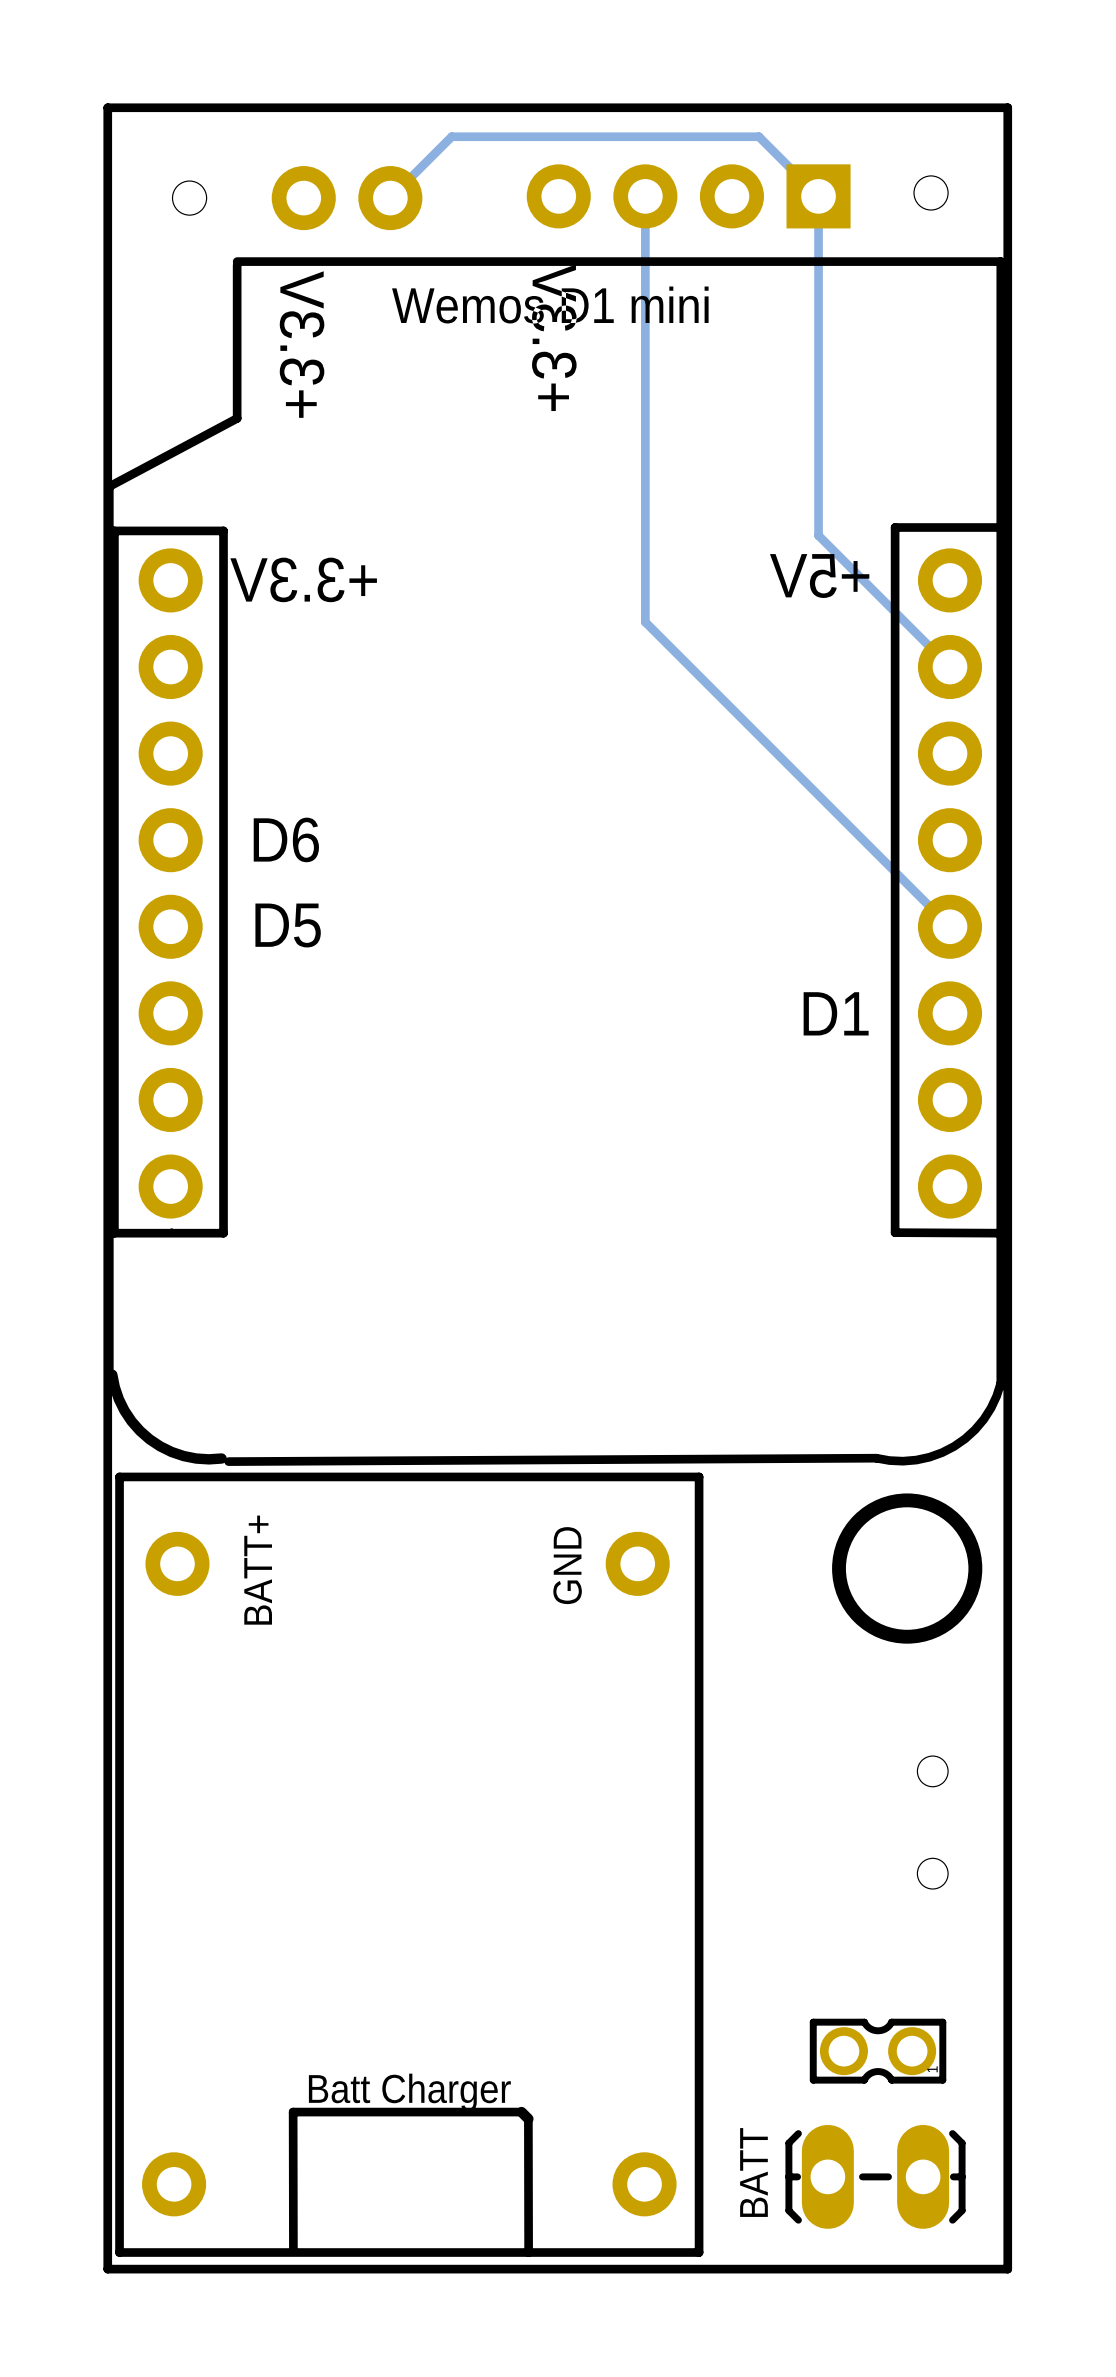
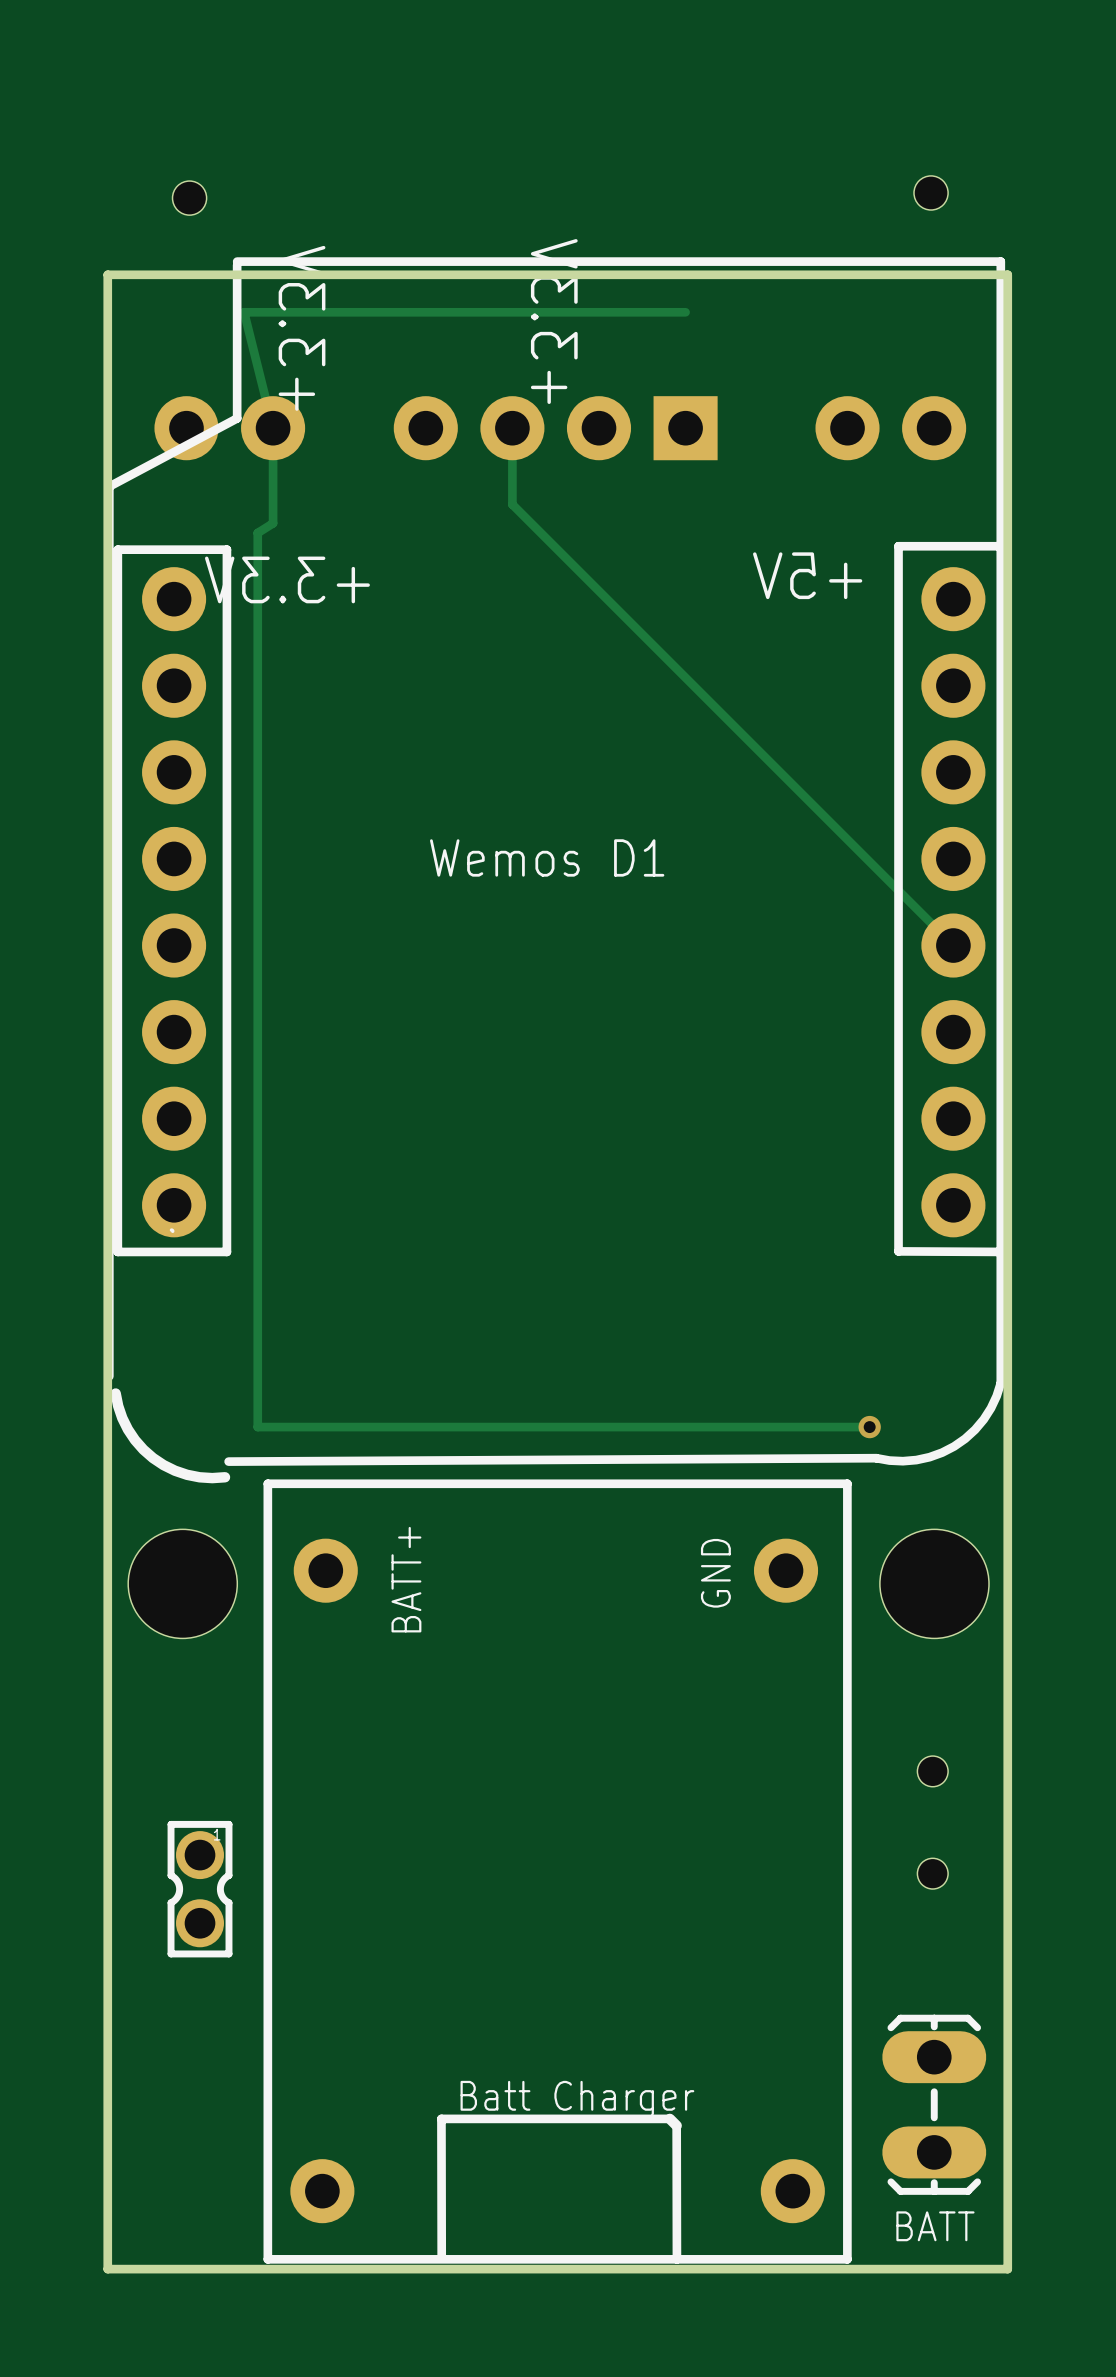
track: (645, 196) (645, 622) (949, 926) -> none
part position: (688, 196) -> (555, 428)
part position: (347, 198) -> (229, 428)
track: (390, 198) (451, 136) (758, 136) (818, 196) (818, 535) (949, 667) -> none
board edge: (1007, 274) (1007, 107) (107, 107) (107, 274) -> (1007, 274) (107, 274)
part value: Wemos D1 mini (550, 305) -> Wemos D1 (547, 857)
track: none -> (685, 312) (244, 312) (273, 428) (273, 523) (257, 533) (257, 1427) (869, 1427)
track: none -> (512, 428) (512, 504) (953, 945)
part: none -> (890, 428)
line: (997, 527) (895, 527) (895, 1232) (1000, 1233) -> (1000, 546) (898, 546) (898, 1251) (1004, 1251)
line: (223, 530) (223, 1233) (114, 1233) (114, 530) (223, 530) -> (226, 549) (226, 1251) (117, 1251) (117, 549) (226, 549)
text: D6 (286, 839) -> none
part position: (170, 883) -> (174, 902)
part position: (949, 883) -> (953, 902)
text: D5 (288, 925) -> none
text: D1 (836, 1013) -> none
line: (112, 1374) (118, 1399) (124, 1410) (131, 1421) (149, 1439) (160, 1446) (183, 1456) (196, 1458) (221, 1458) -> (115, 1393) (122, 1418) (127, 1429) (135, 1440) (153, 1458) (163, 1465) (187, 1474) (199, 1477) (225, 1477)
via: none -> (869, 1427)
line: (699, 1476) (699, 2252) (119, 2252) (119, 1476) (699, 1476) -> (847, 1483) (847, 2259) (267, 2259) (267, 1483) (847, 1483)
round board edge: [832, 1493, 983, 1644] -> none
part footprint: [145, 1531, 210, 1596] -> [128, 1529, 238, 1639]
part position: (637, 1563) -> (786, 1570)
text position: GND (567, 1565) -> GND (715, 1573)
text position: BATT+ (258, 1570) -> BATT+ (406, 1579)
part: none -> (325, 1570)
part: none -> (934, 1583)
part: none -> (200, 1889)
part: (878, 2051) -> none
BATT name position: BATT (753, 2172) -> BATT (935, 2226)
BATT rotation: 0° (875, 2176) -> 90° clockwise (934, 2104)
part position: (174, 2184) -> (322, 2191)
part position: (644, 2184) -> (792, 2191)
line: (293, 2249) (293, 2112) (521, 2112) (528, 2118) (528, 2252) -> (441, 2255) (441, 2118) (669, 2118) (676, 2125) (676, 2259)

